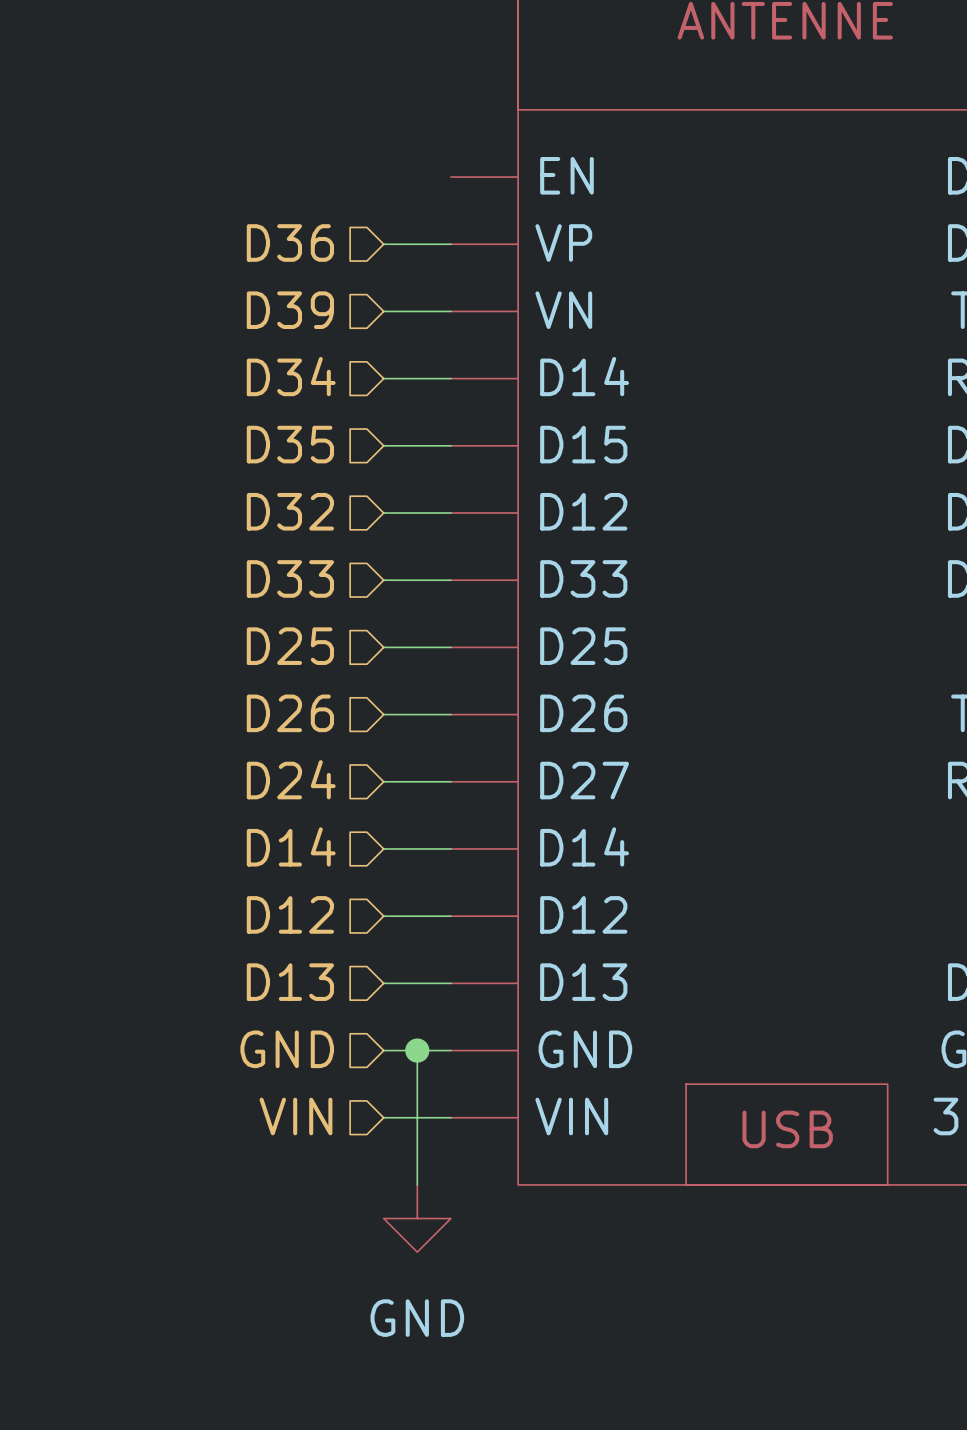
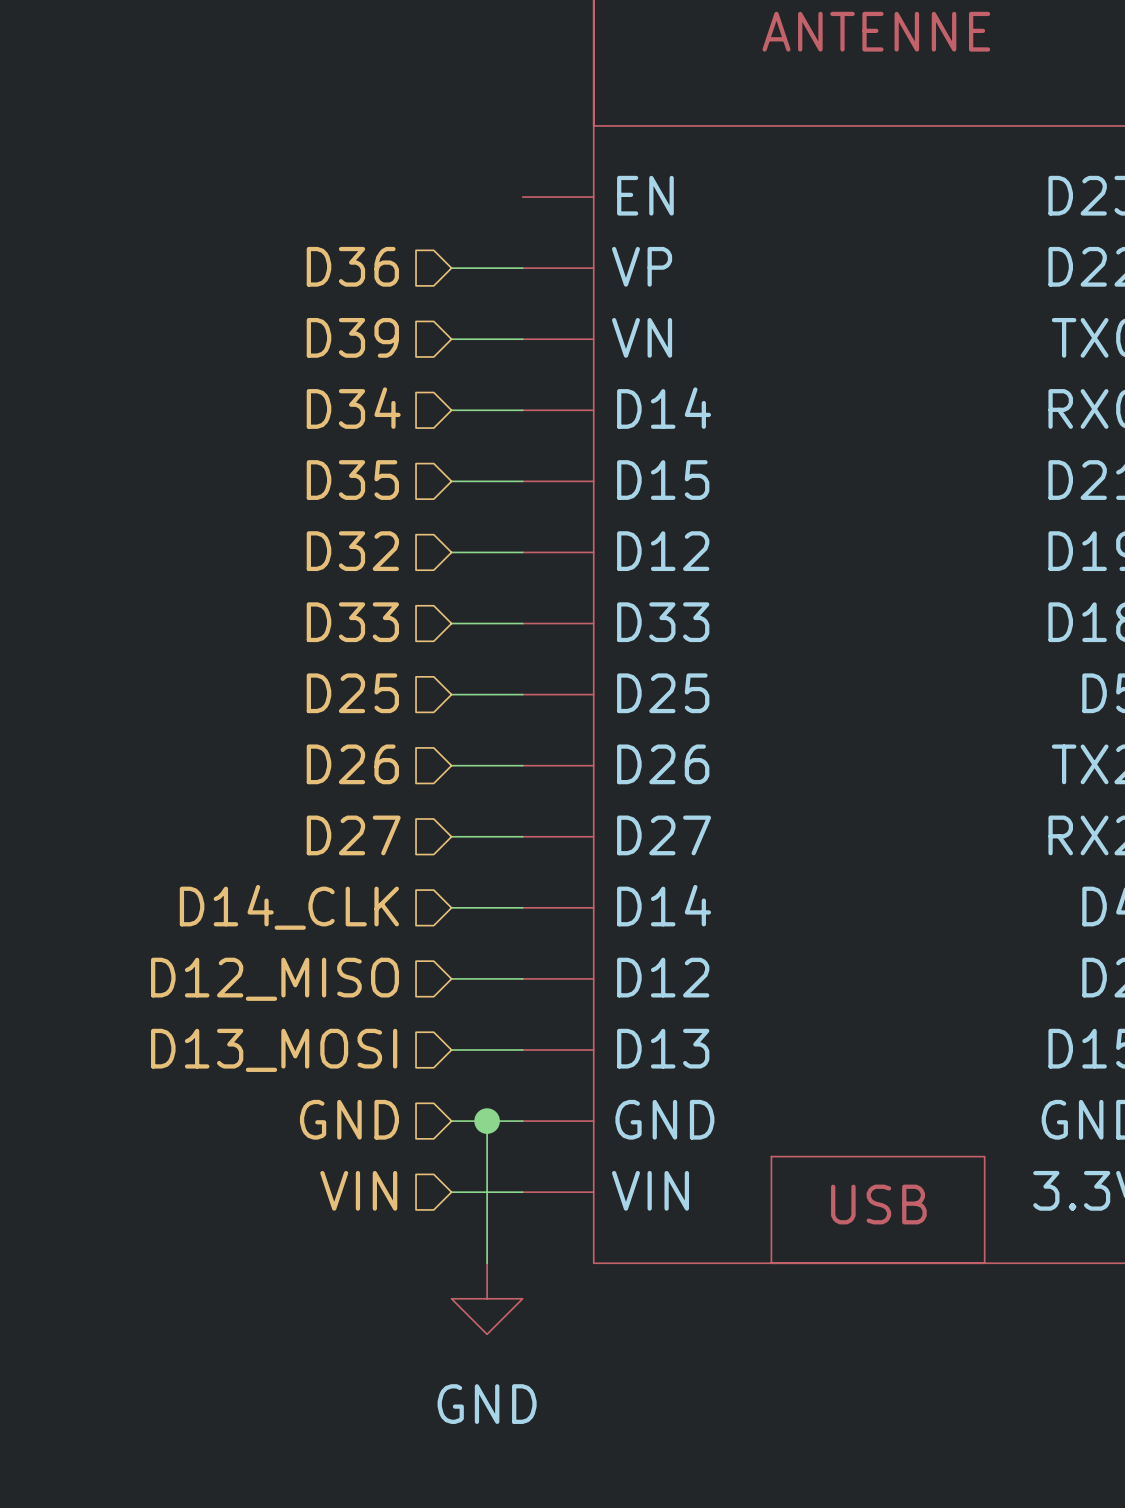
hierarchical label: D24 (291, 779) -> D27 (353, 835)
hierarchical label: D14 (291, 846) -> D14_CLK (289, 907)
hierarchical label: D12 (290, 914) -> D12_MISO (275, 979)
hierarchical label: D13 (290, 982) -> D13_MOSI (274, 1050)

